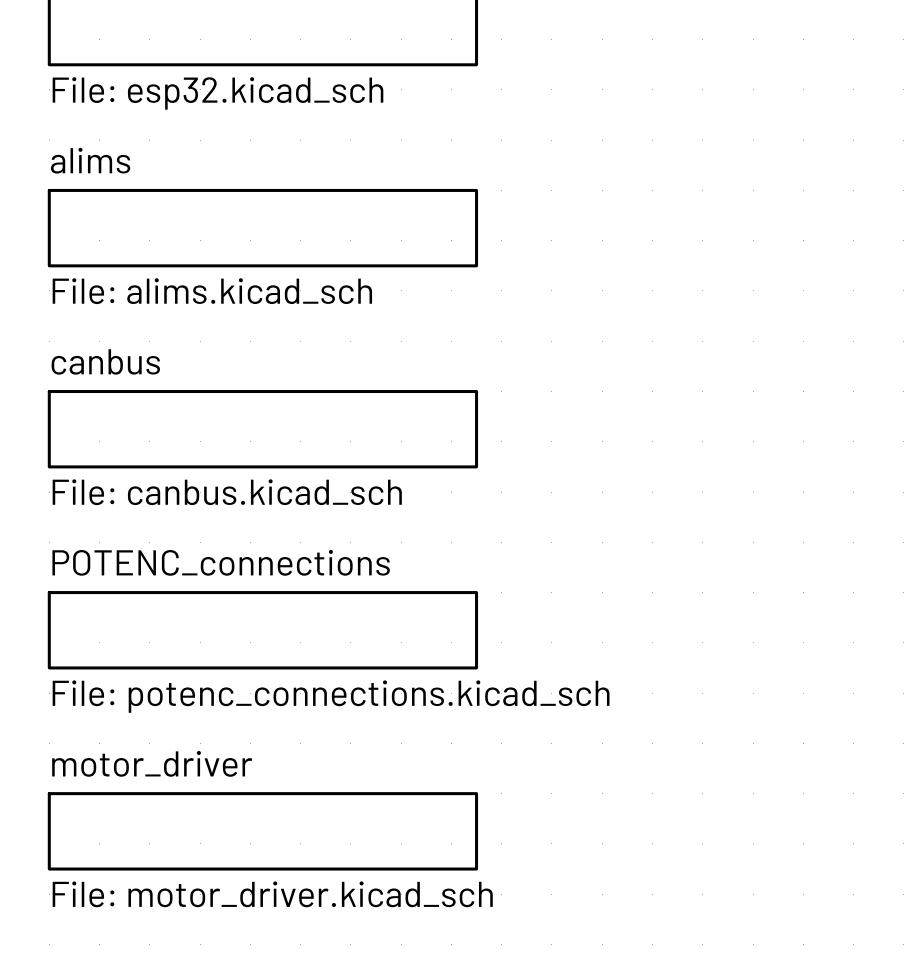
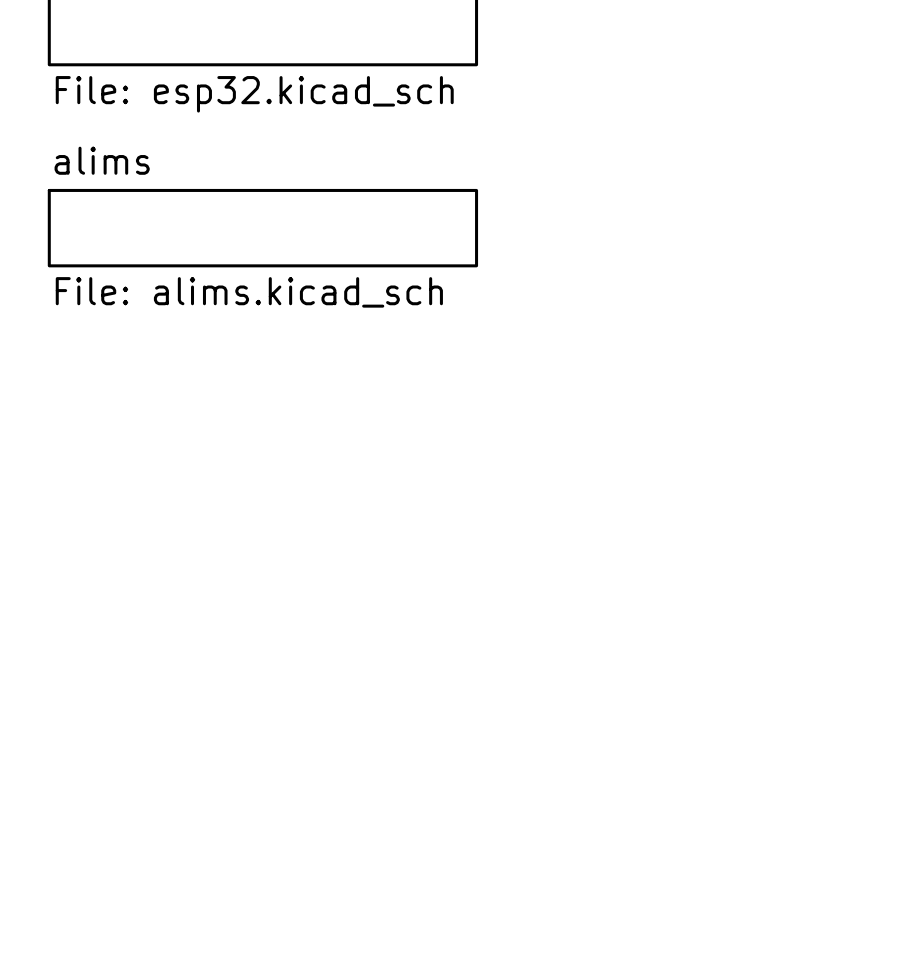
sheet canbus: File: canbus.kicad_sch (262, 429) -> none
sheet POTENC_connections: File: potenc_connections.kicad_sch (262, 630) -> none
sheet motor_driver: File: motor_driver.kicad_sch (262, 831) -> none

